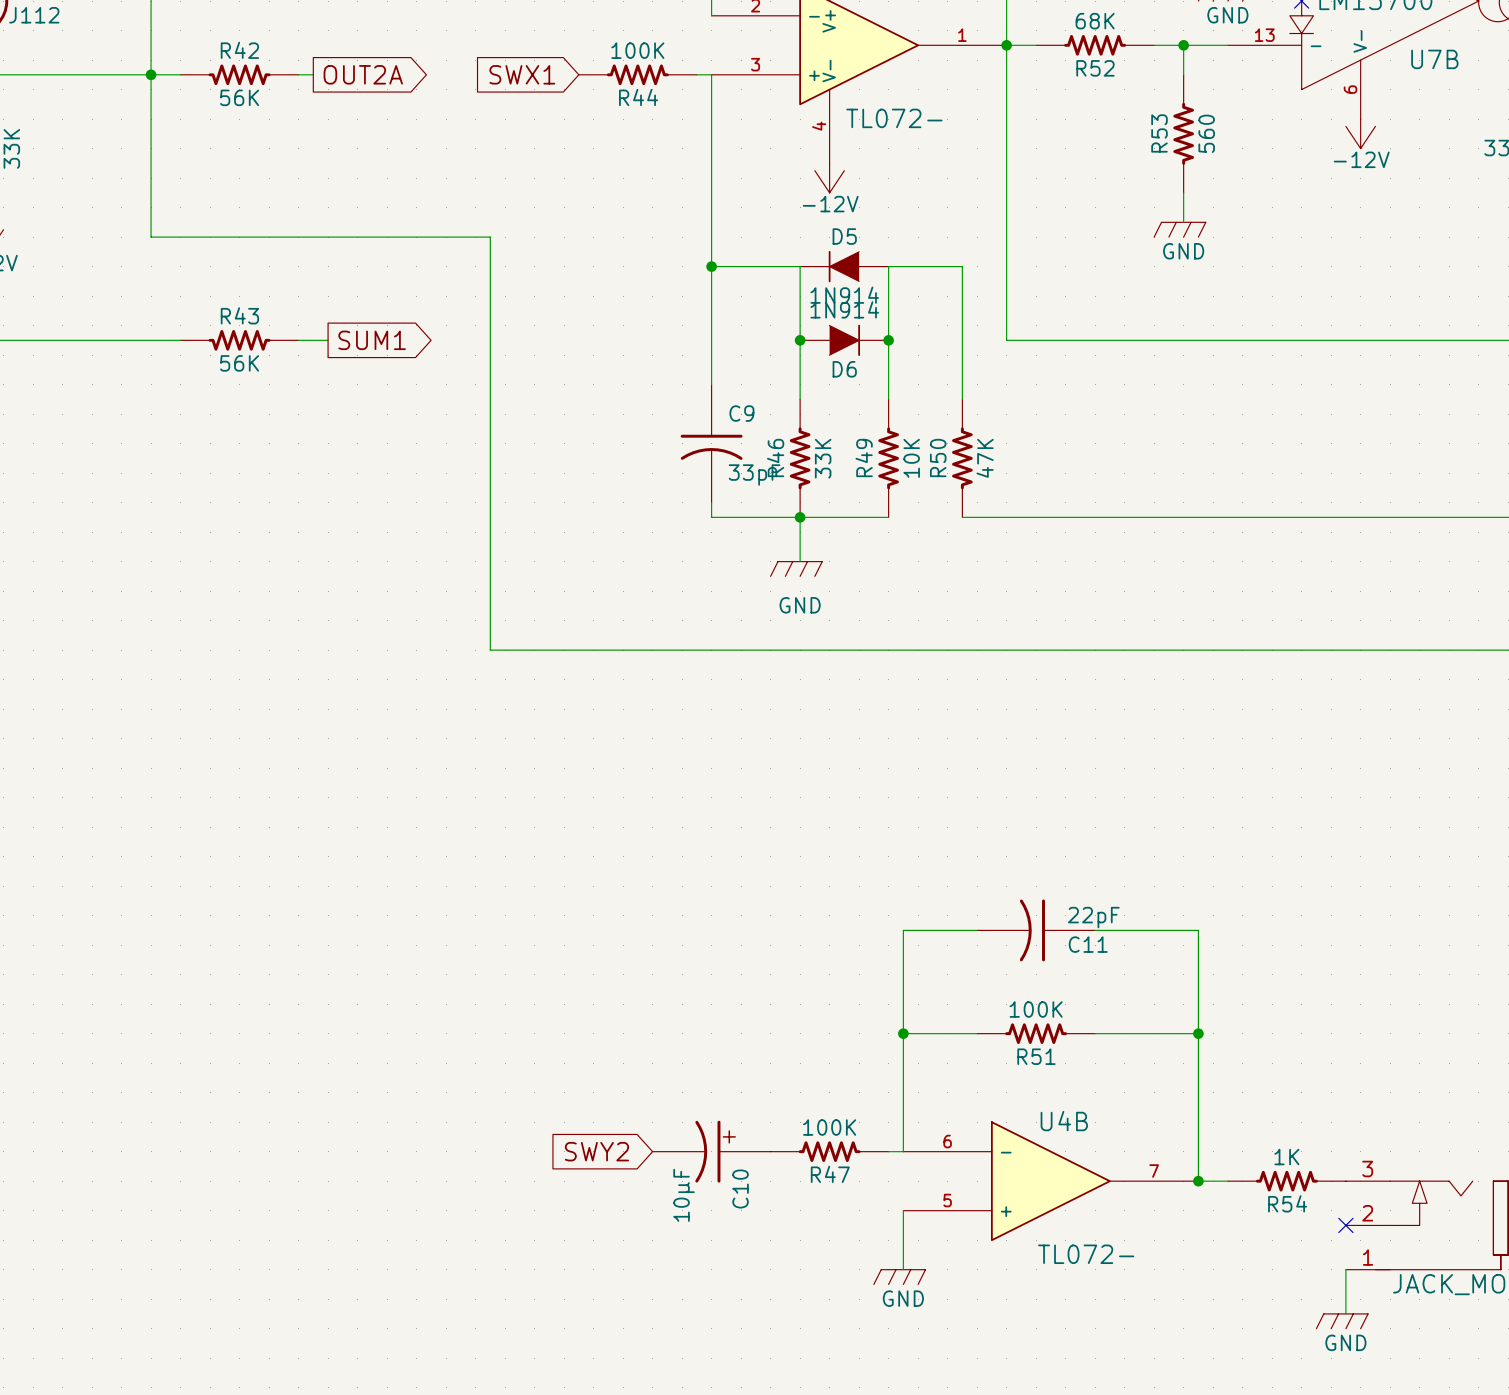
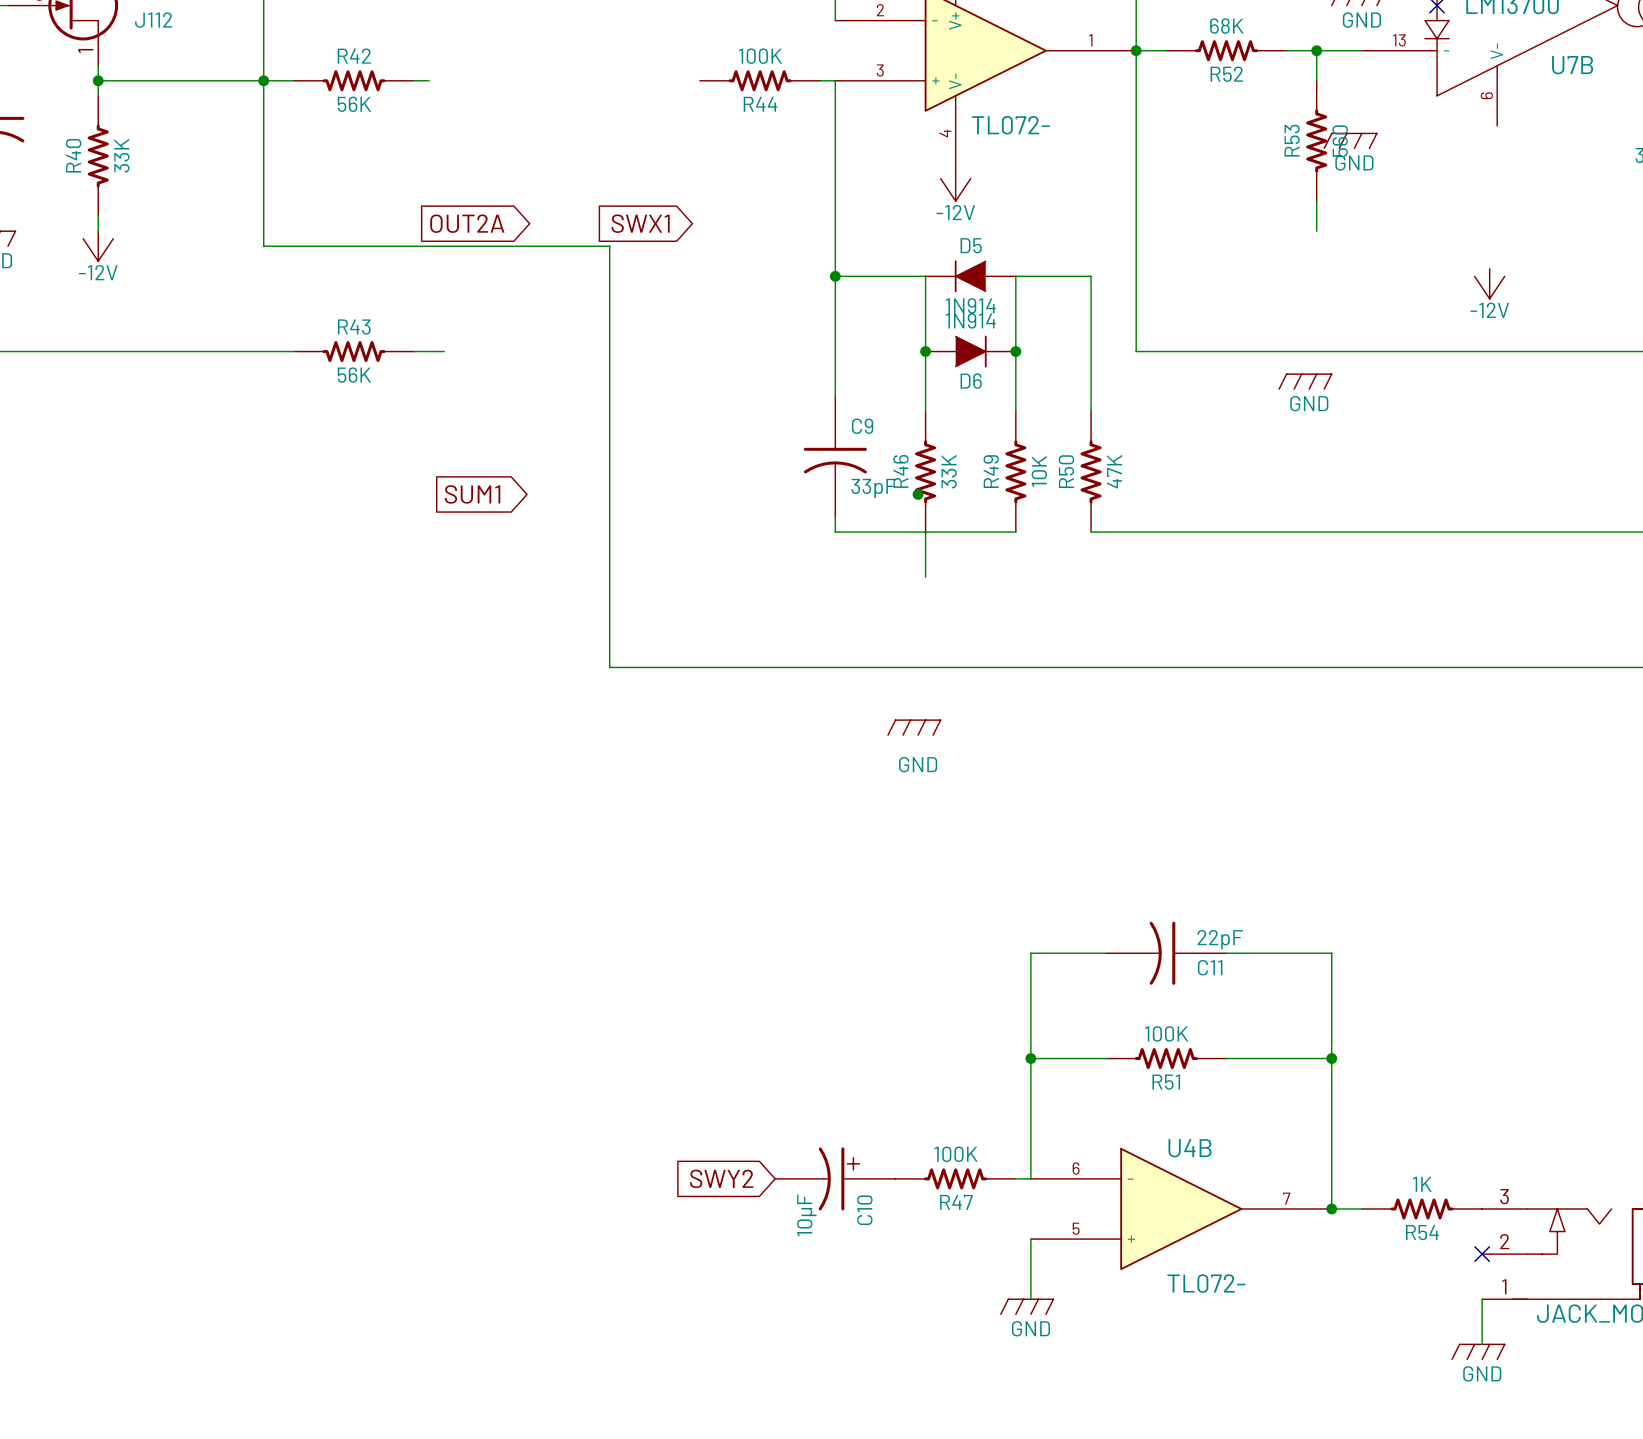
global label position: OUT2A (363, 74) -> OUT2A (467, 223)
global label position: SWX1 (522, 74) -> SWX1 (640, 223)
power symbol: none -> GND (1350, 140)
power symbol position: -12V (1360, 133) -> -12V (1489, 283)
power symbol: GND (1179, 229) -> none
global label position: SUM1 (372, 340) -> SUM1 (472, 494)
power symbol: none -> GND (1305, 381)
junction position: (800, 517) -> (918, 494)
power symbol position: GND (796, 568) -> GND (914, 727)

